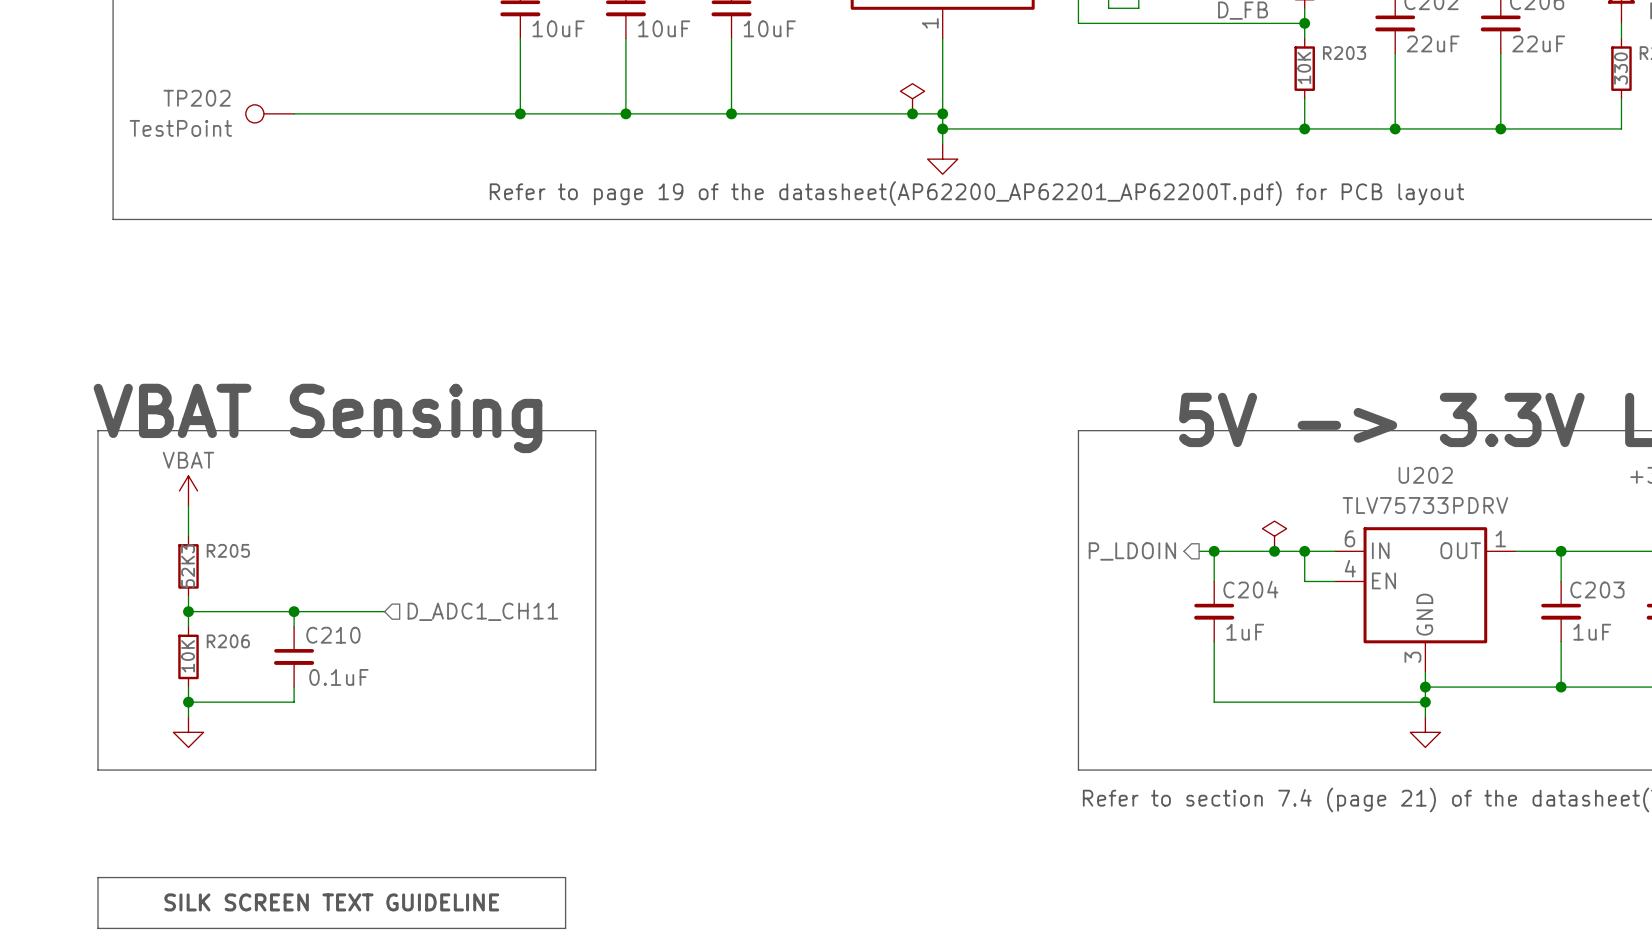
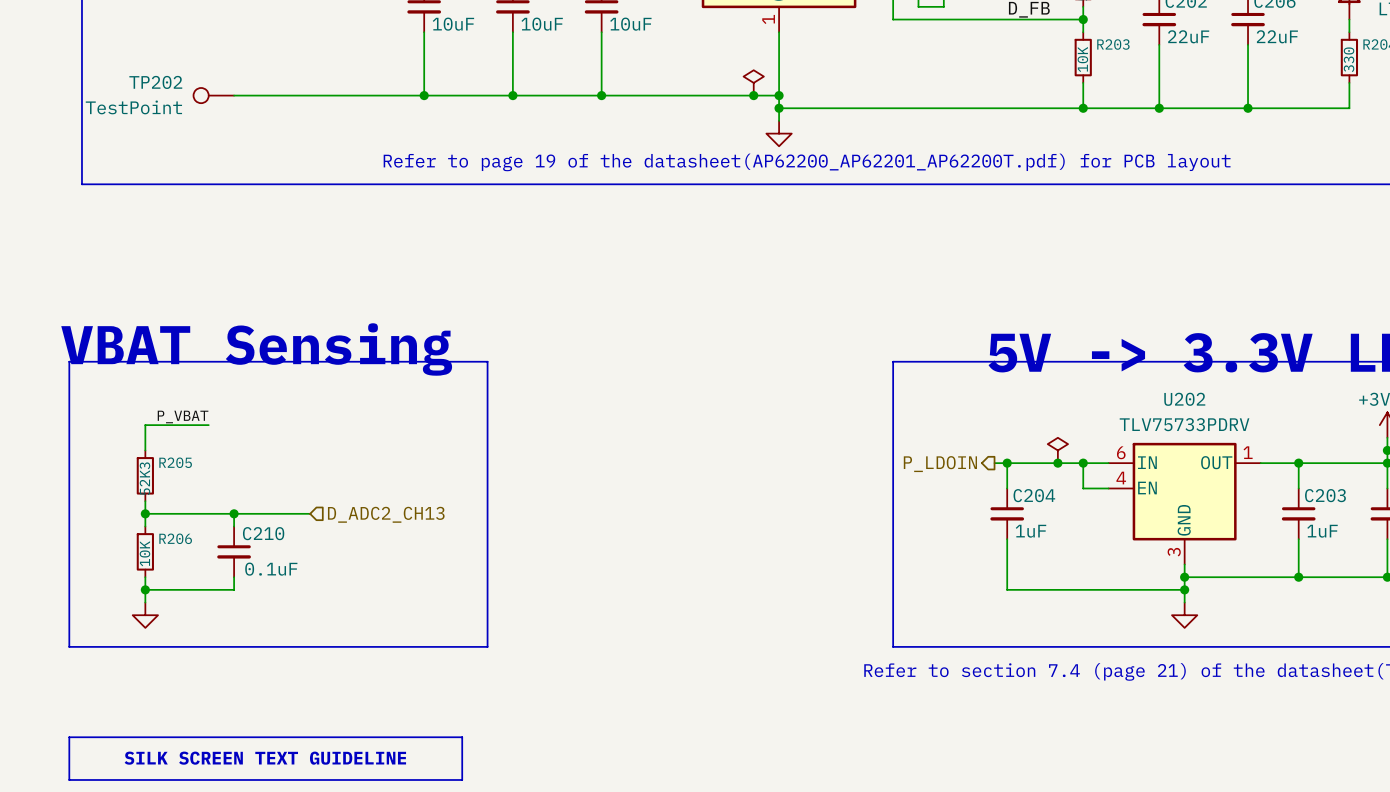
power symbol: VBAT (188, 490) -> none
label: none -> P_VBAT (183, 416)
wire: none -> (145, 425) (208, 425)
hierarchical label: D_ADC1_CH11 (482, 611) -> D_ADC2_CH13 (386, 514)

